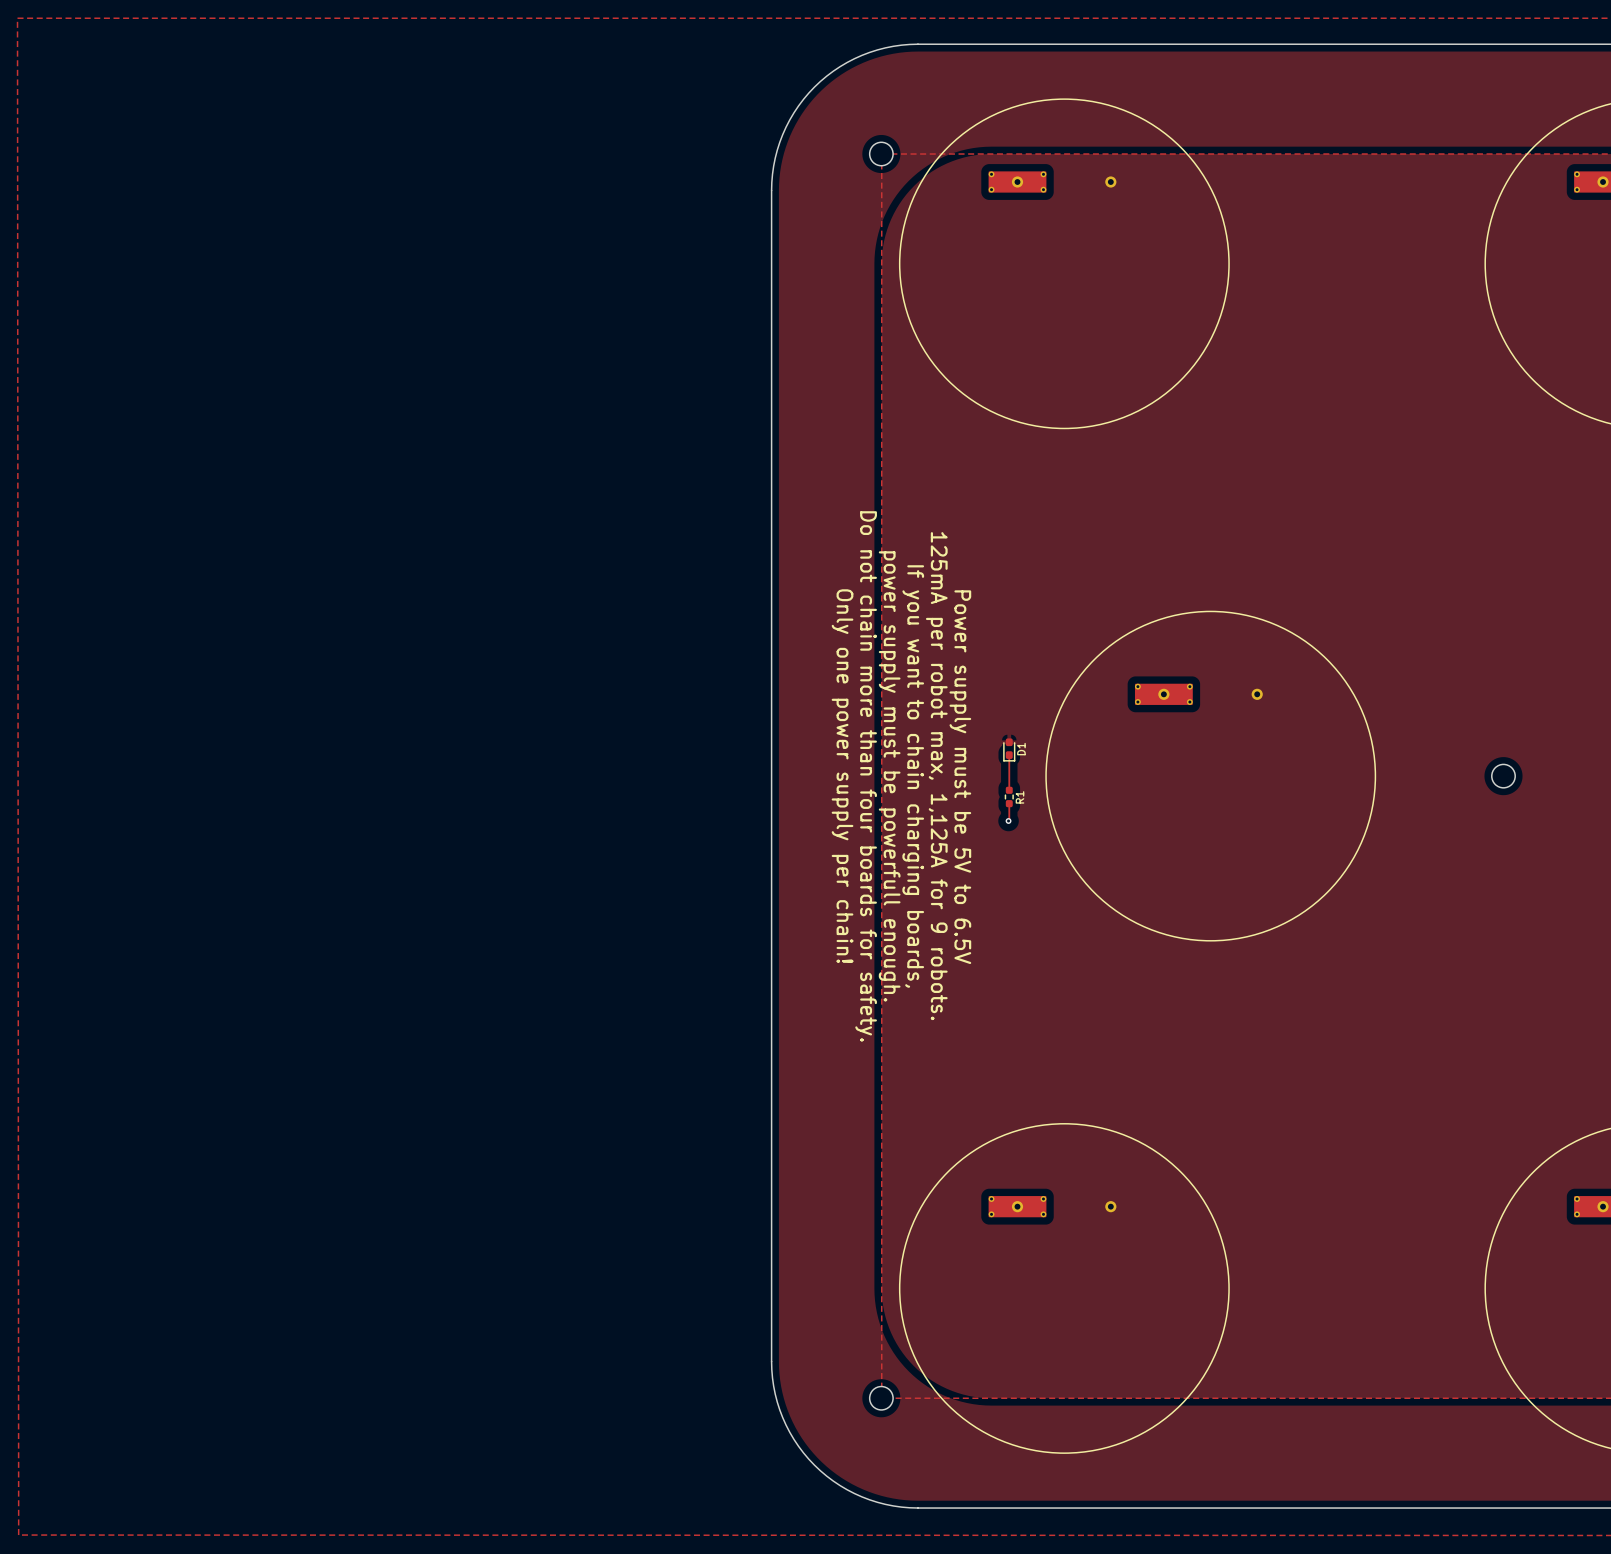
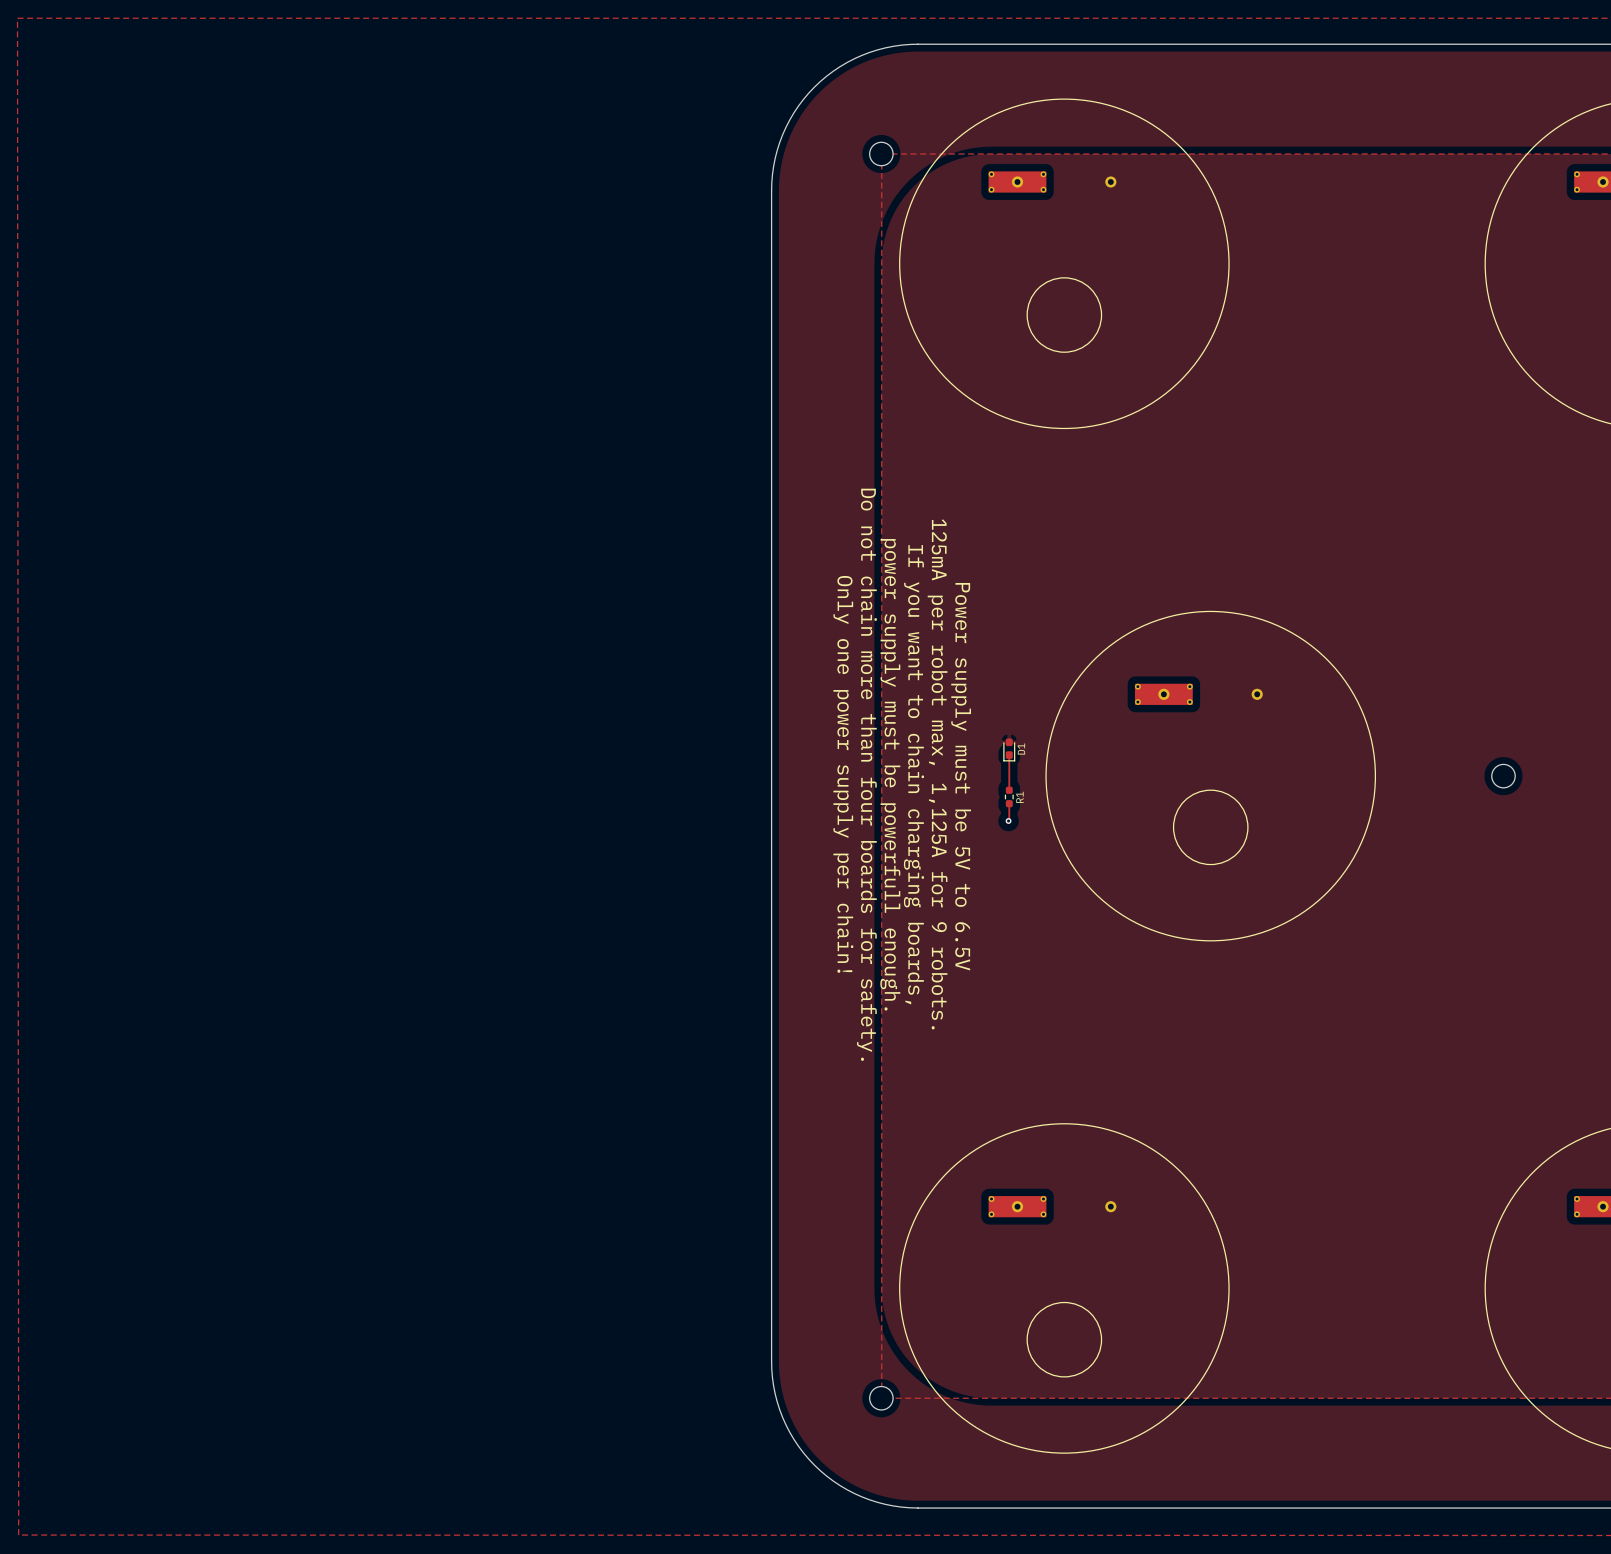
drawing: none -> [1026, 277, 1103, 353]
drawing: none -> [1173, 789, 1249, 866]
drawing: none -> [1026, 1301, 1103, 1378]

